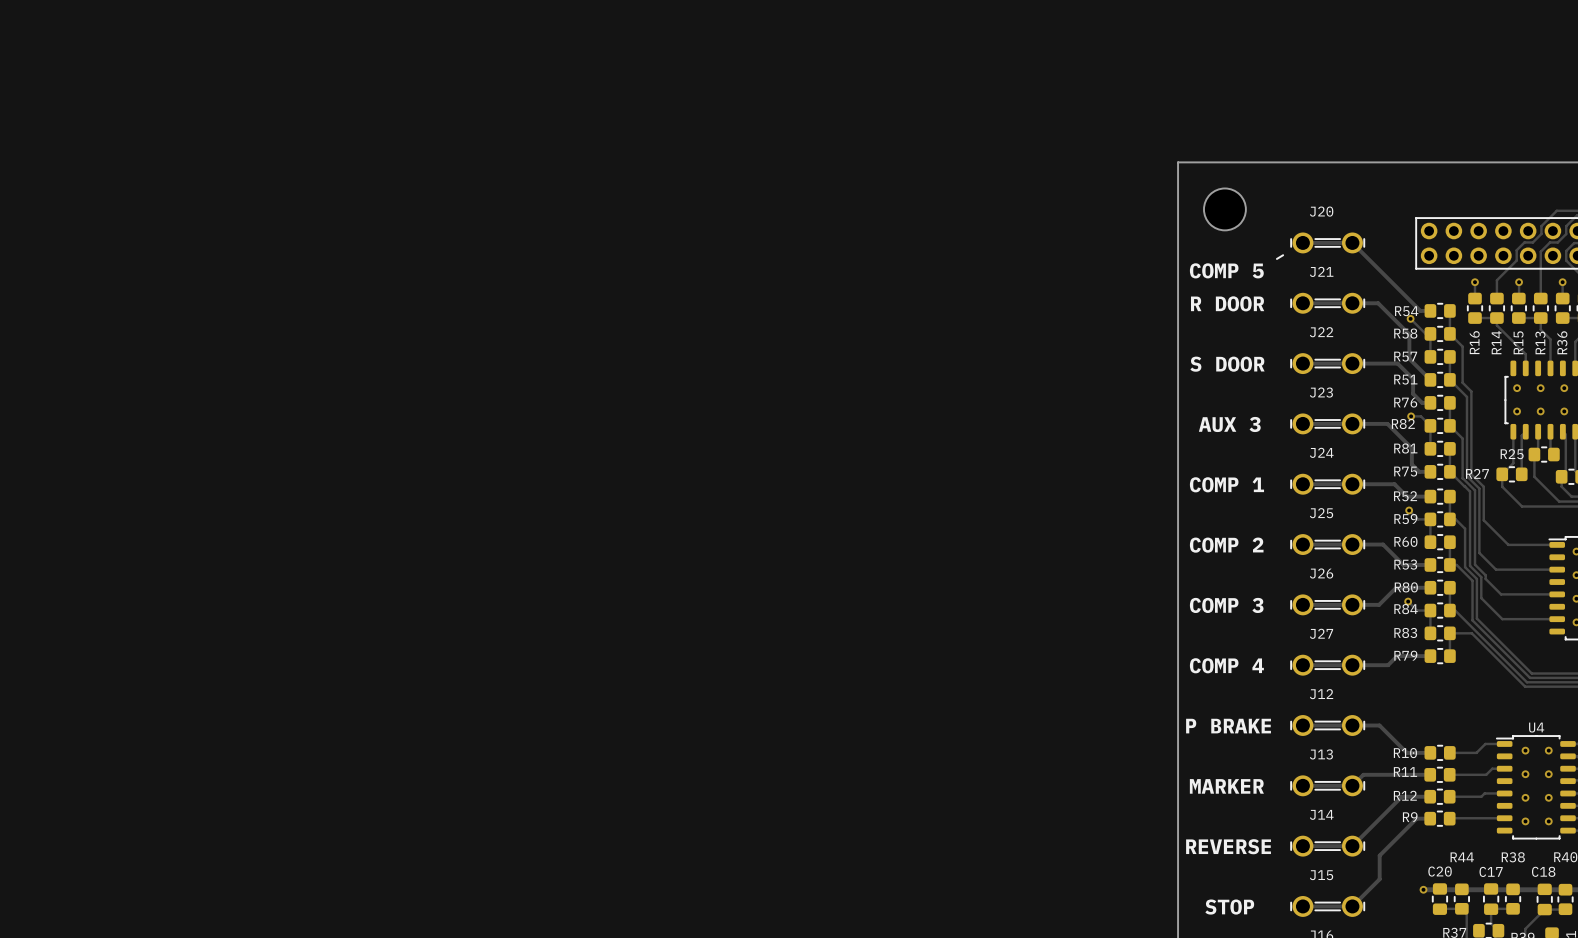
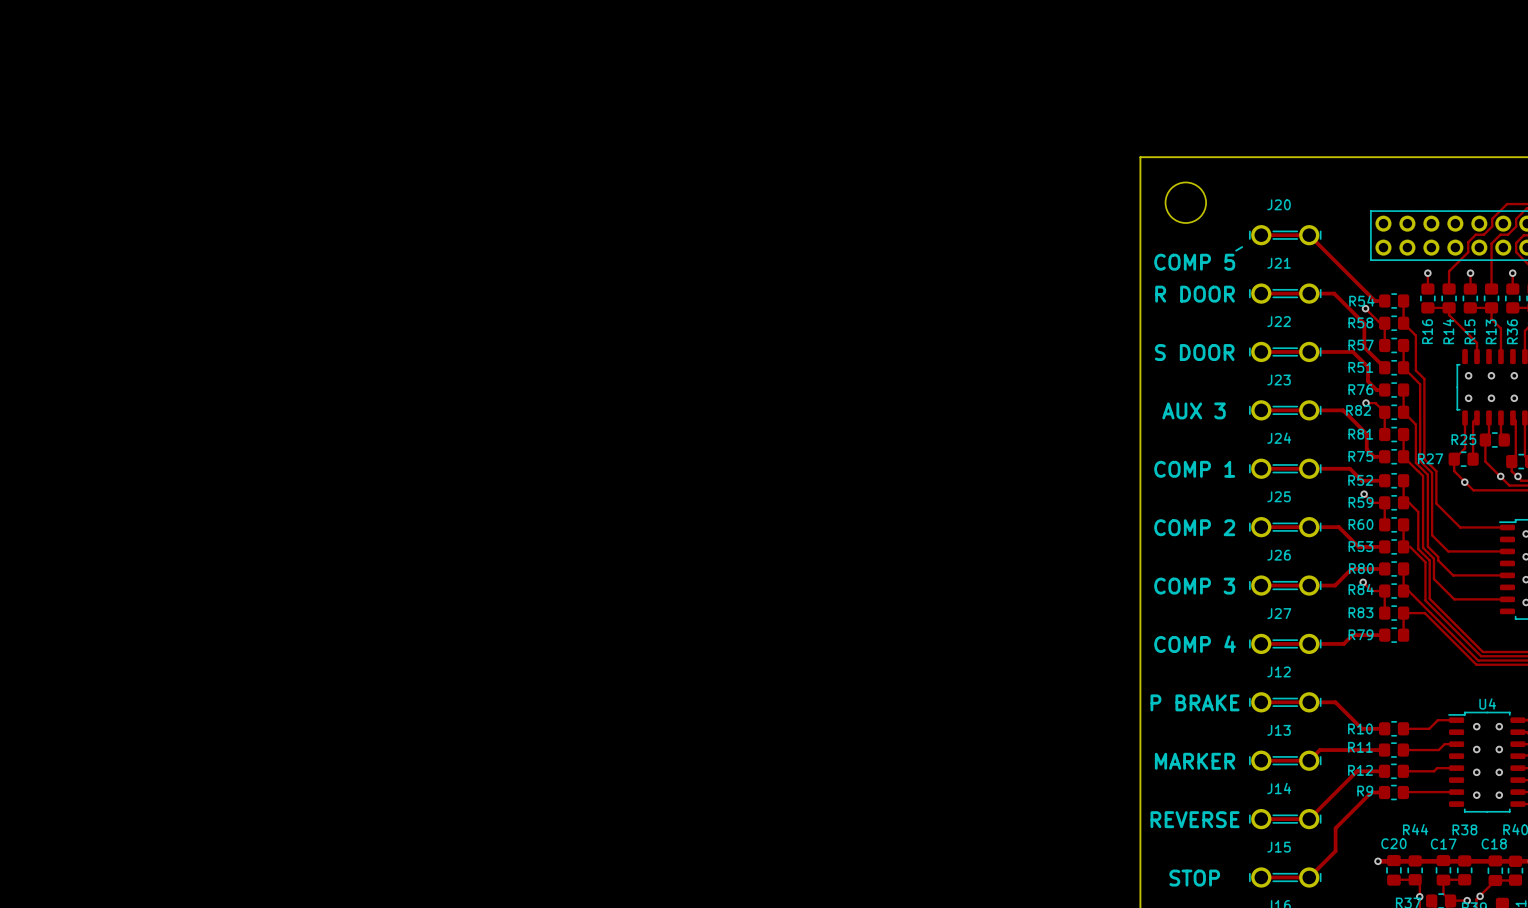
via: none -> (1500, 476)
via: none -> (1517, 476)
via: none -> (1464, 482)
via: none -> (1480, 896)
via: none -> (1419, 896)
track: none -> (1467, 900) (1450, 901)
via: none -> (1467, 900)

